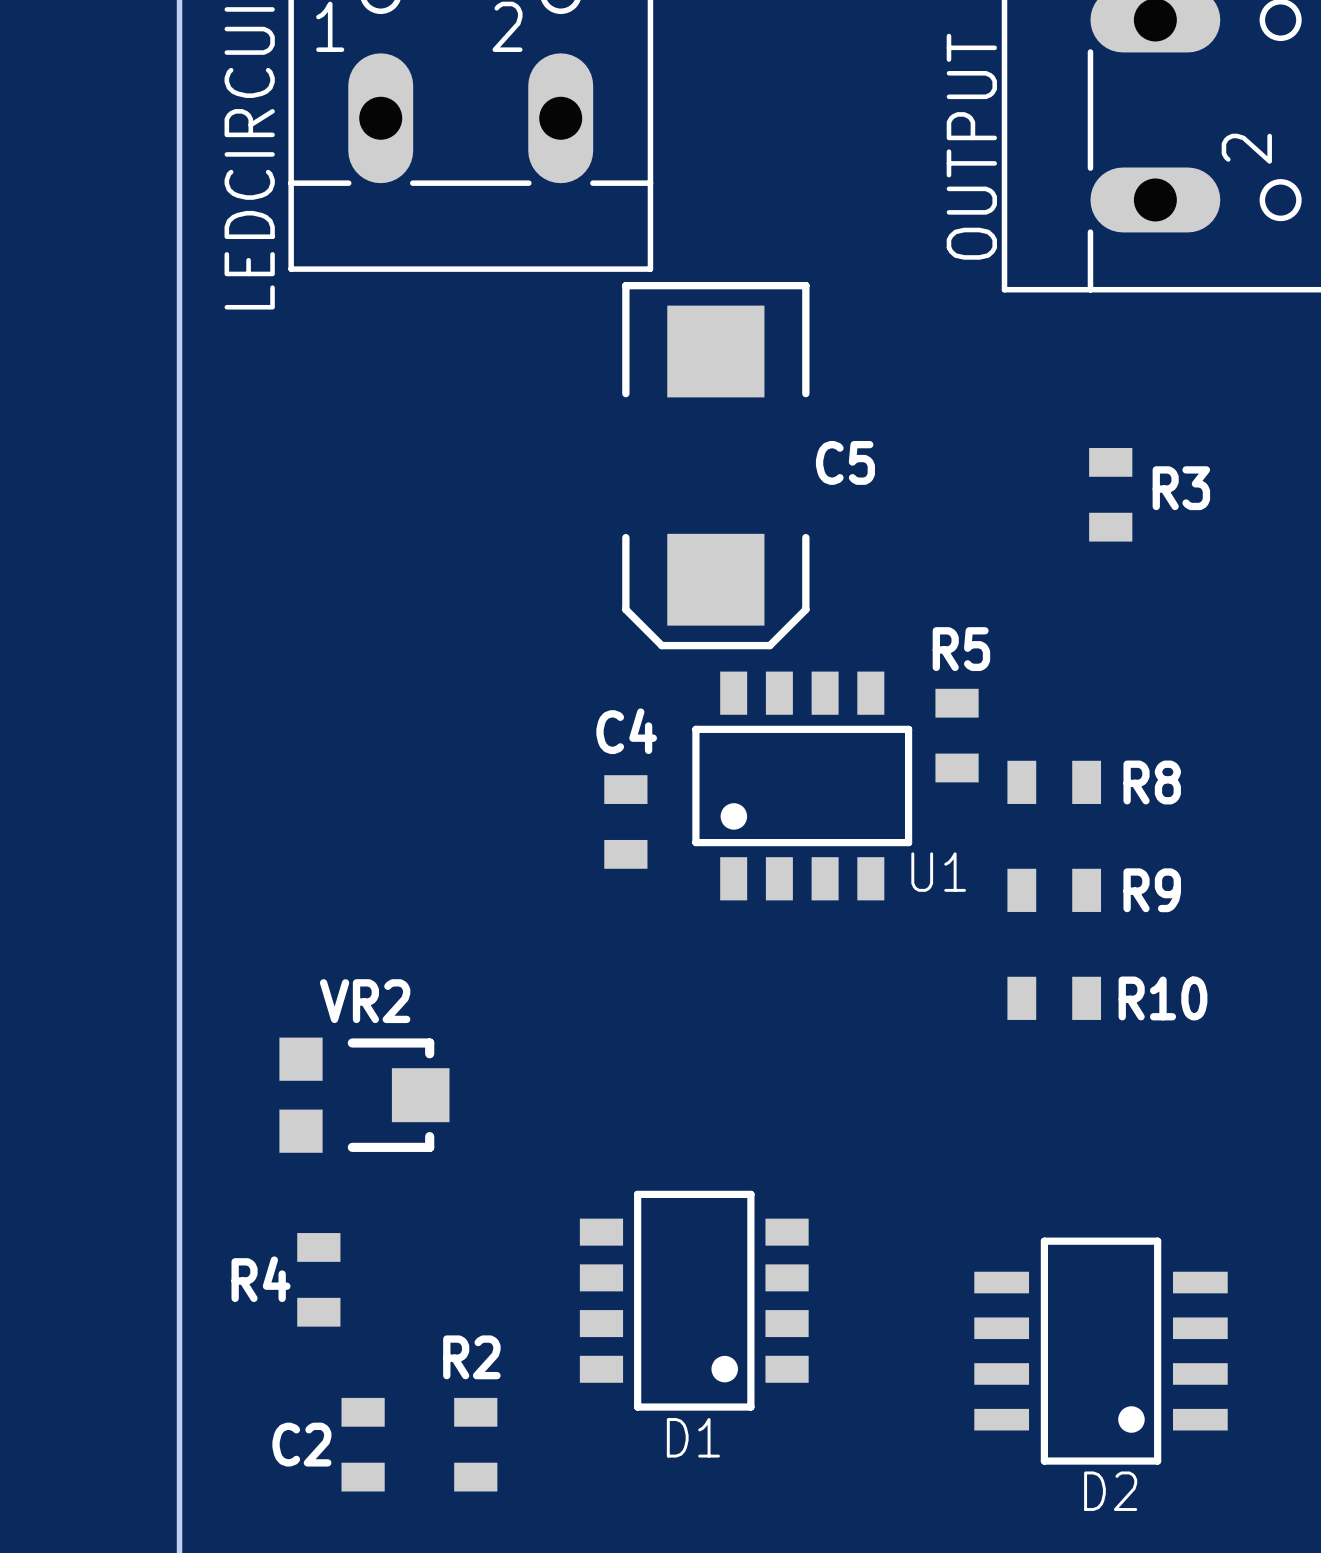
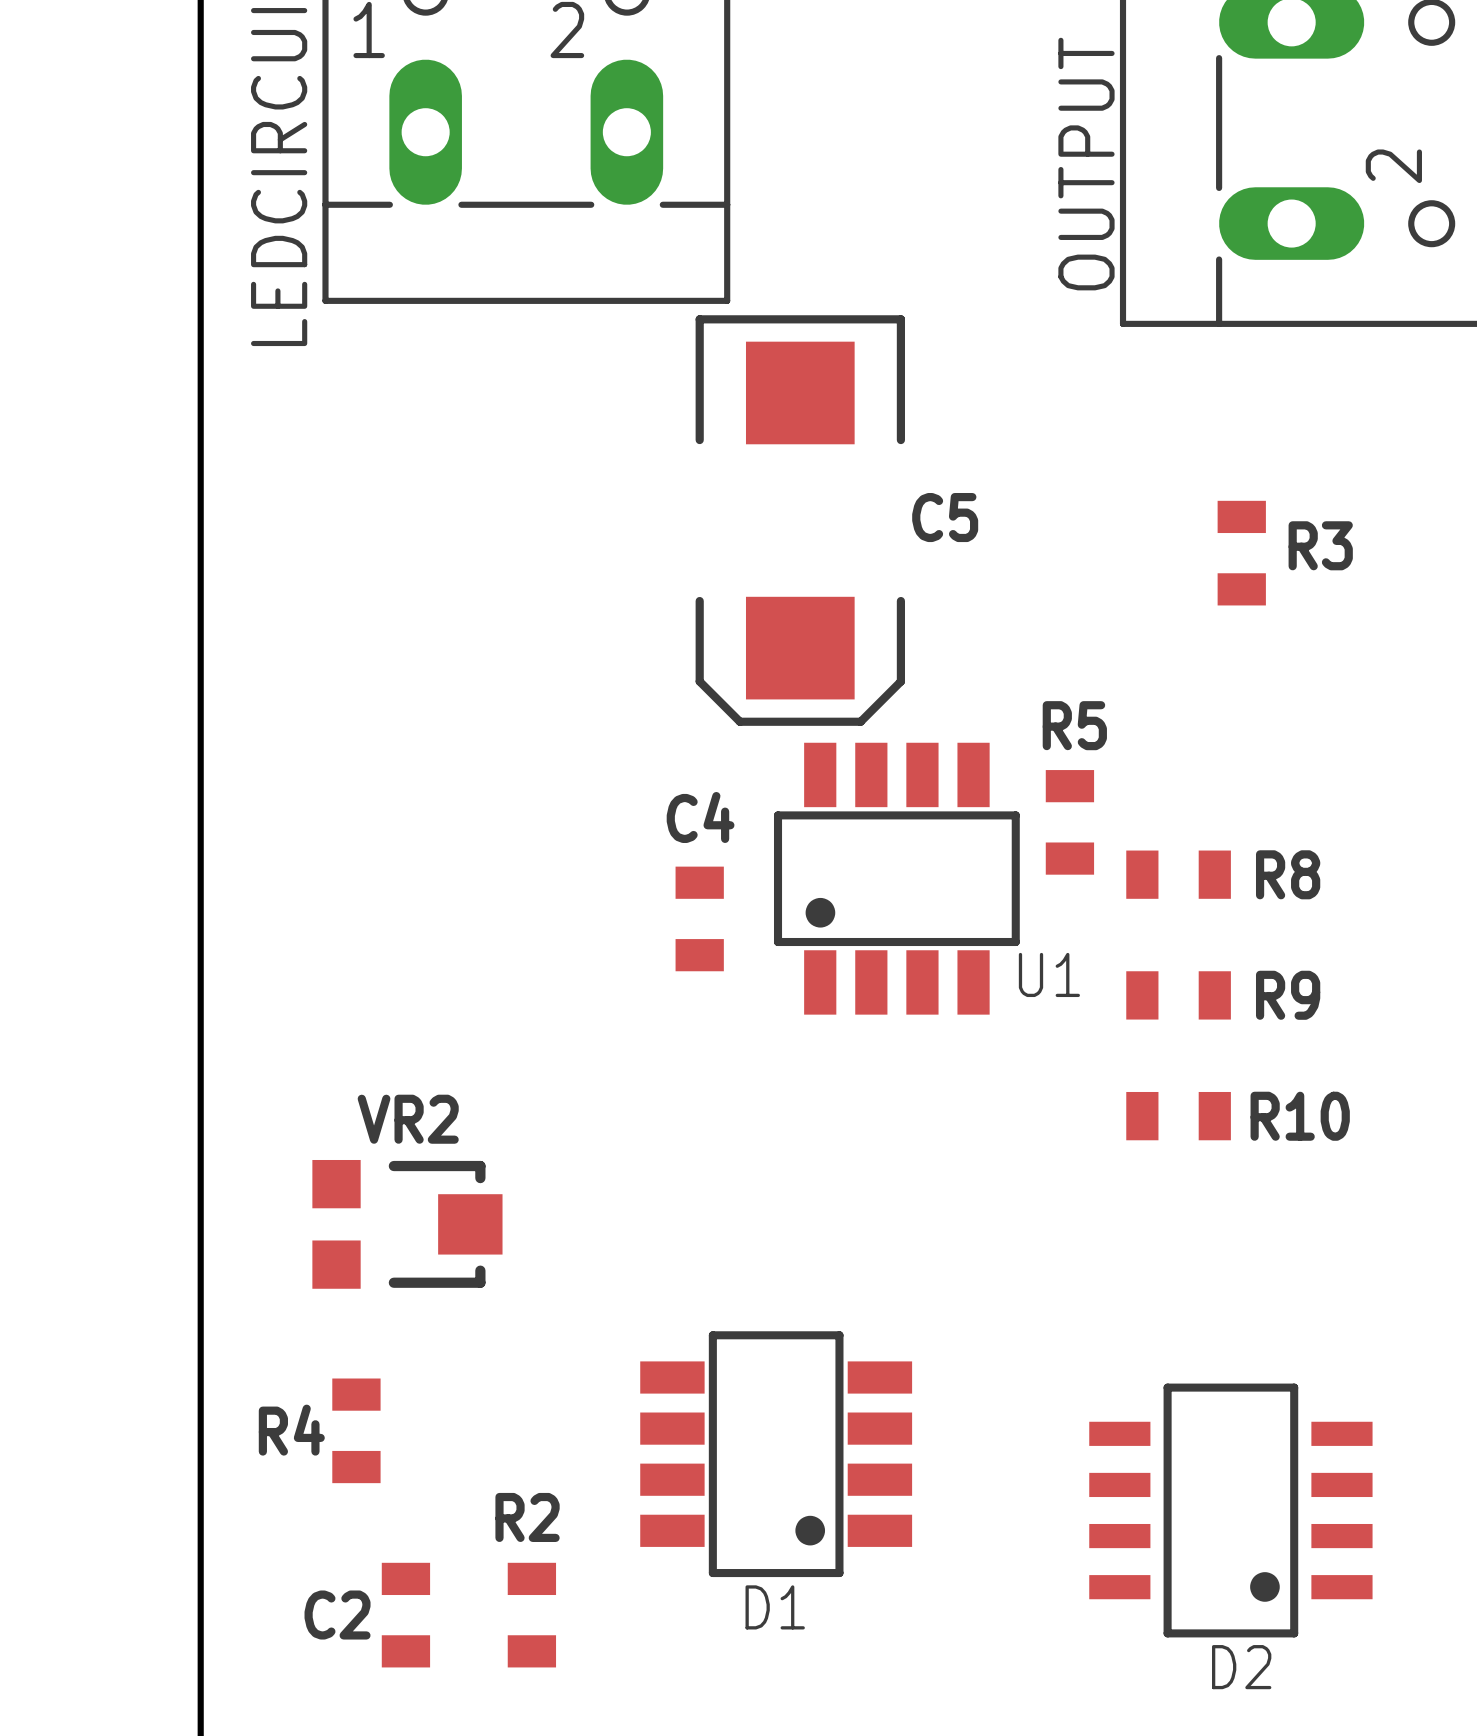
U1 footprint: [692, 671, 913, 901] -> [773, 742, 1020, 1015]
D1 footprint: [579, 1190, 809, 1411] -> [640, 1331, 913, 1578]

